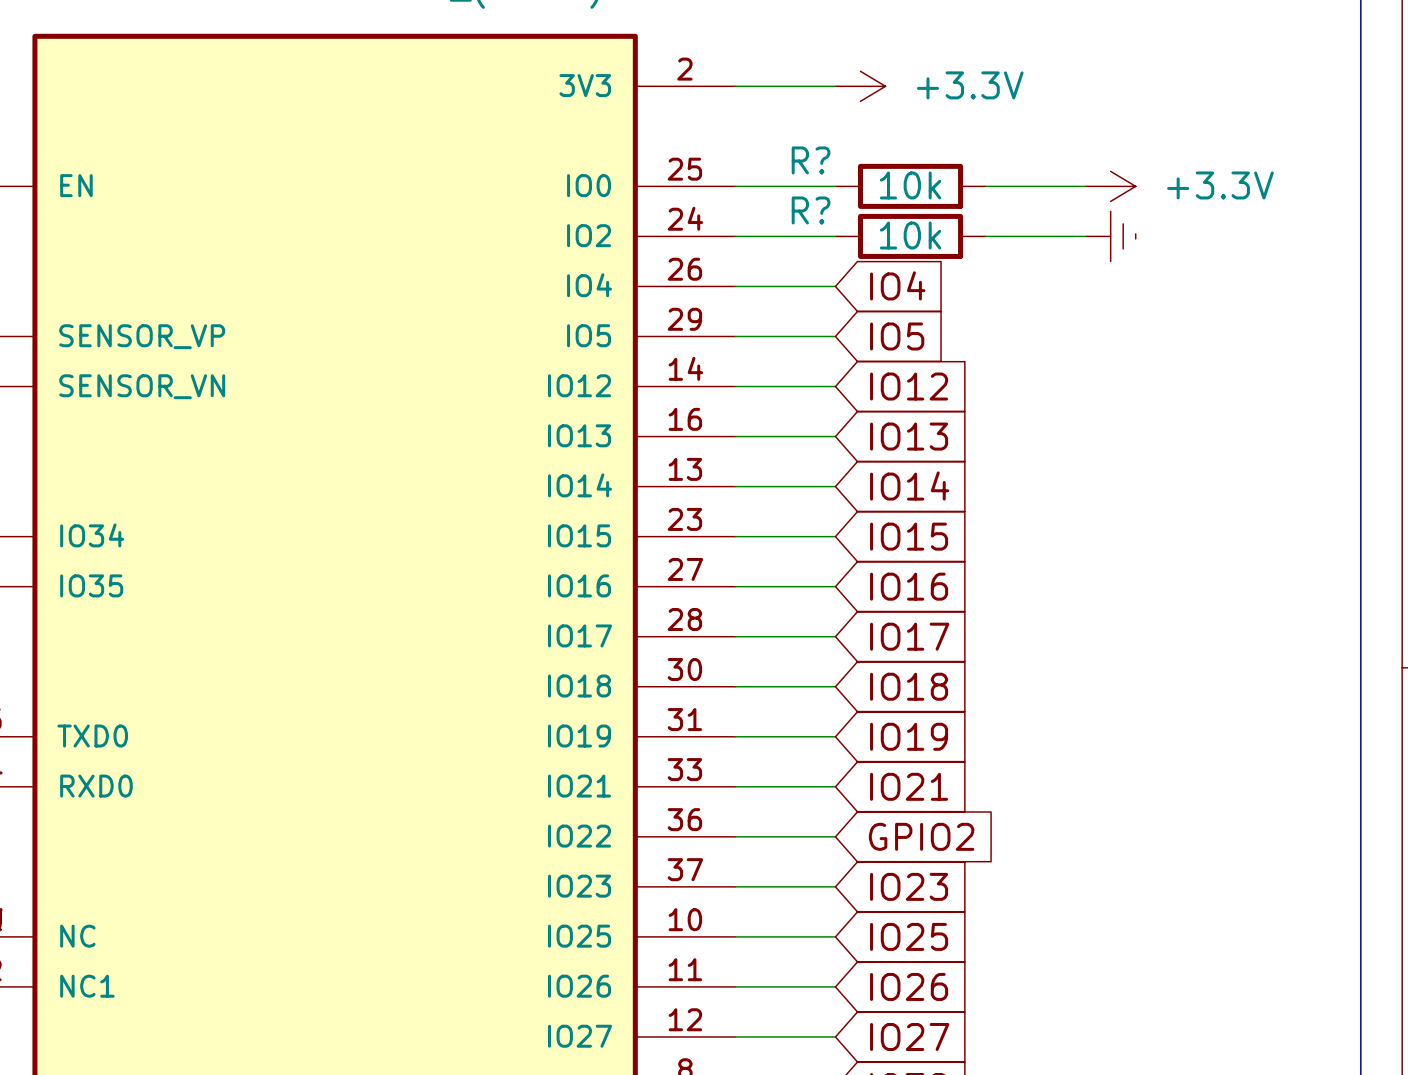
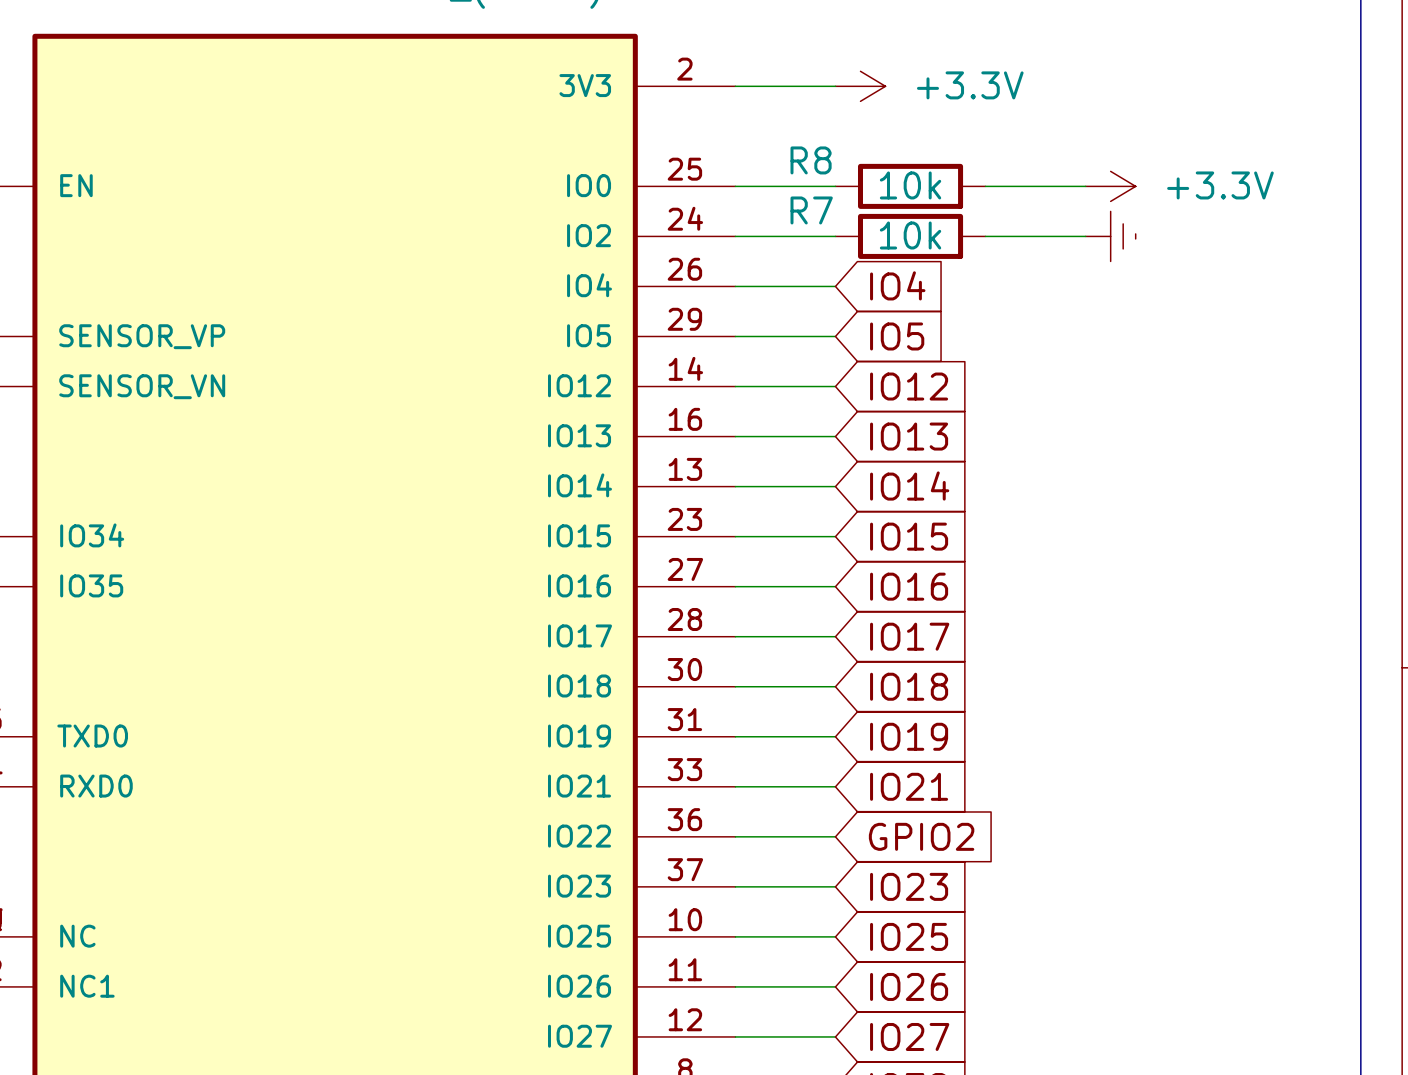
R? name: R? (811, 160) -> R8 (811, 160)
R? name: R? (811, 210) -> R7 (811, 210)

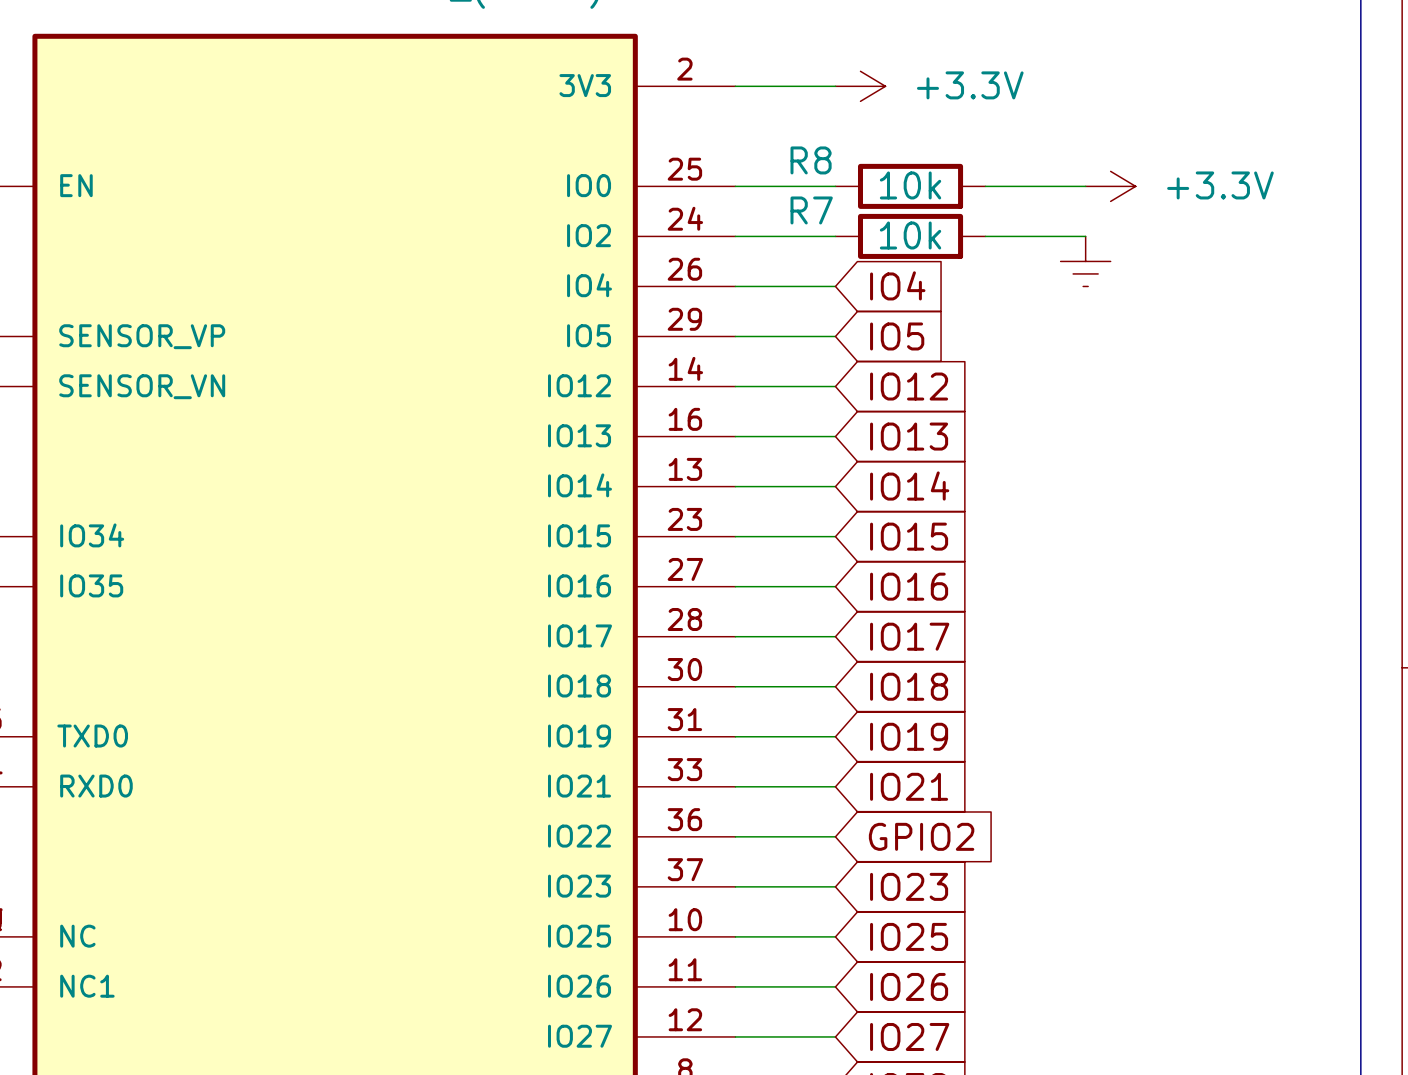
power symbol rotation: 0° (1110, 236) -> 90° clockwise (1085, 261)
power symbol position: (1110, 236) -> (1085, 261)

